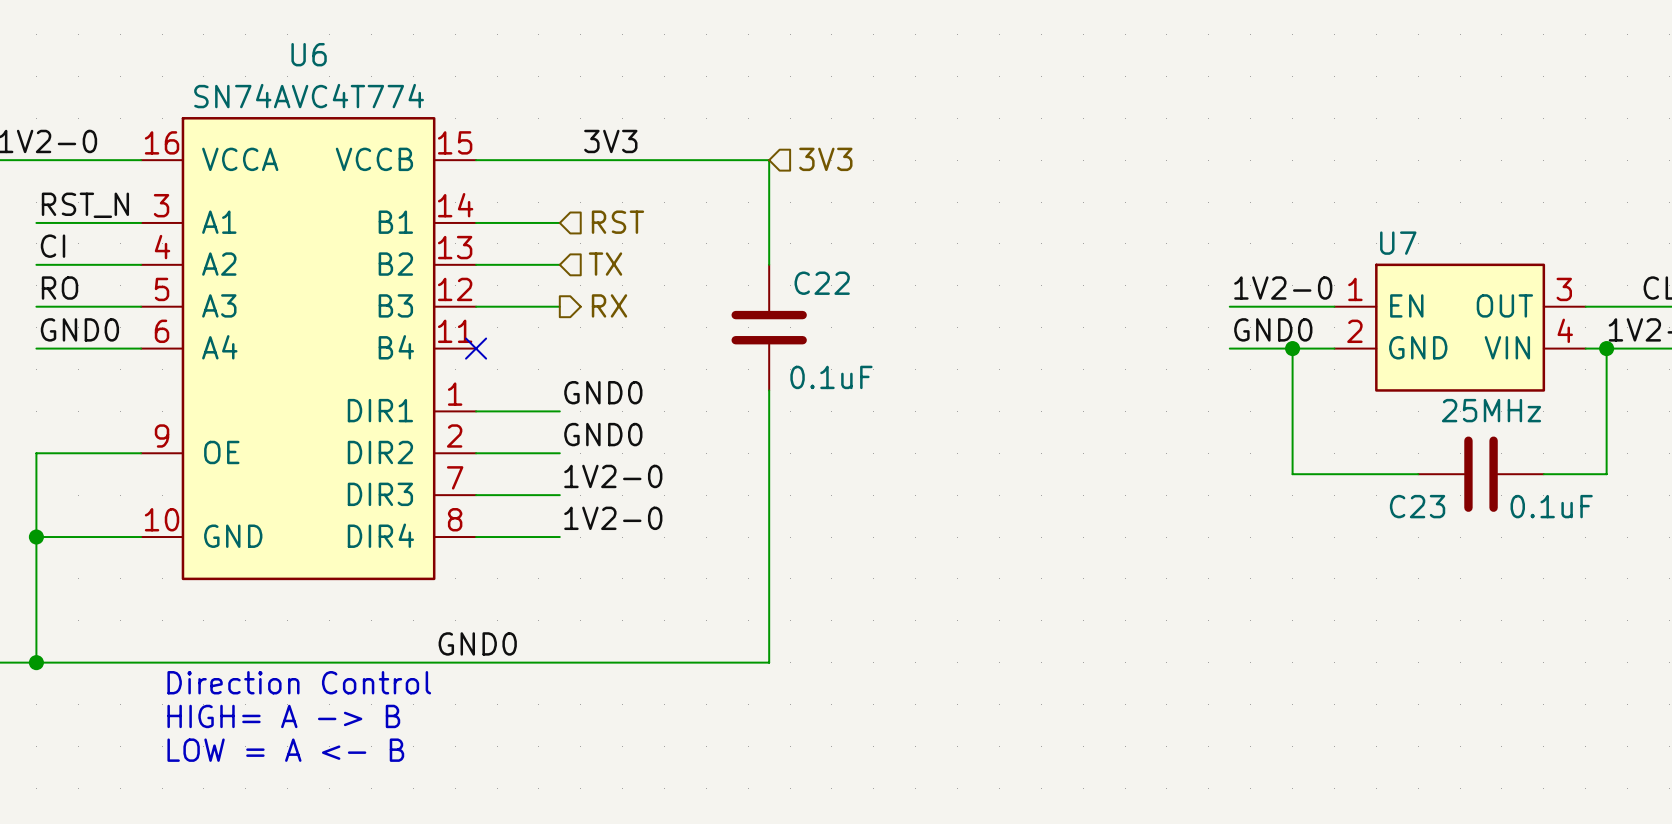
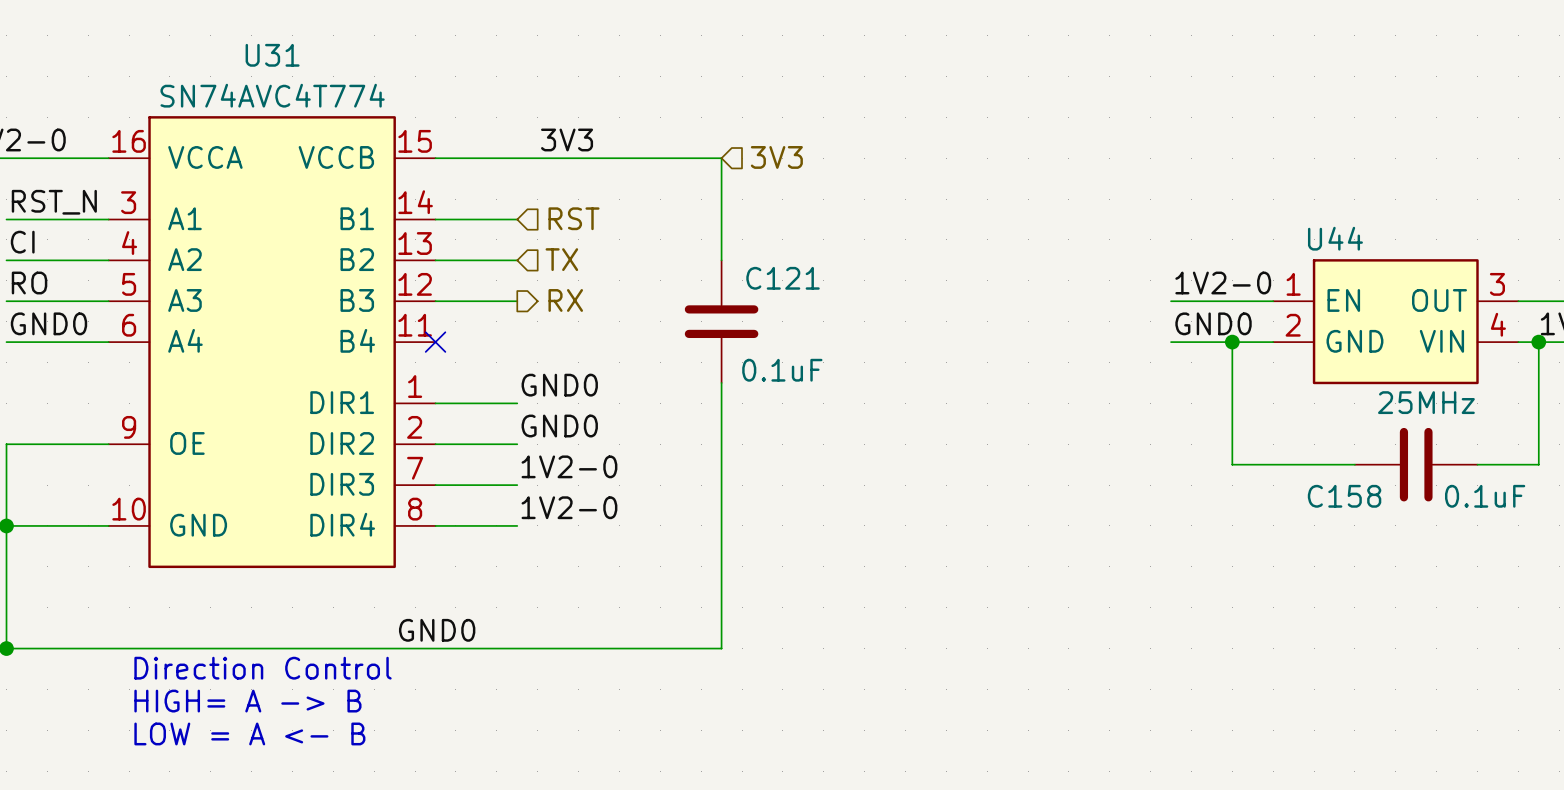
U6 name: U6 (309, 54) -> U31 (272, 55)
U7 name: U7 (1398, 243) -> U44 (1335, 238)
C22 name: C22 (822, 283) -> C121 (783, 278)
C23 name: C23 (1417, 506) -> C158 (1344, 496)

